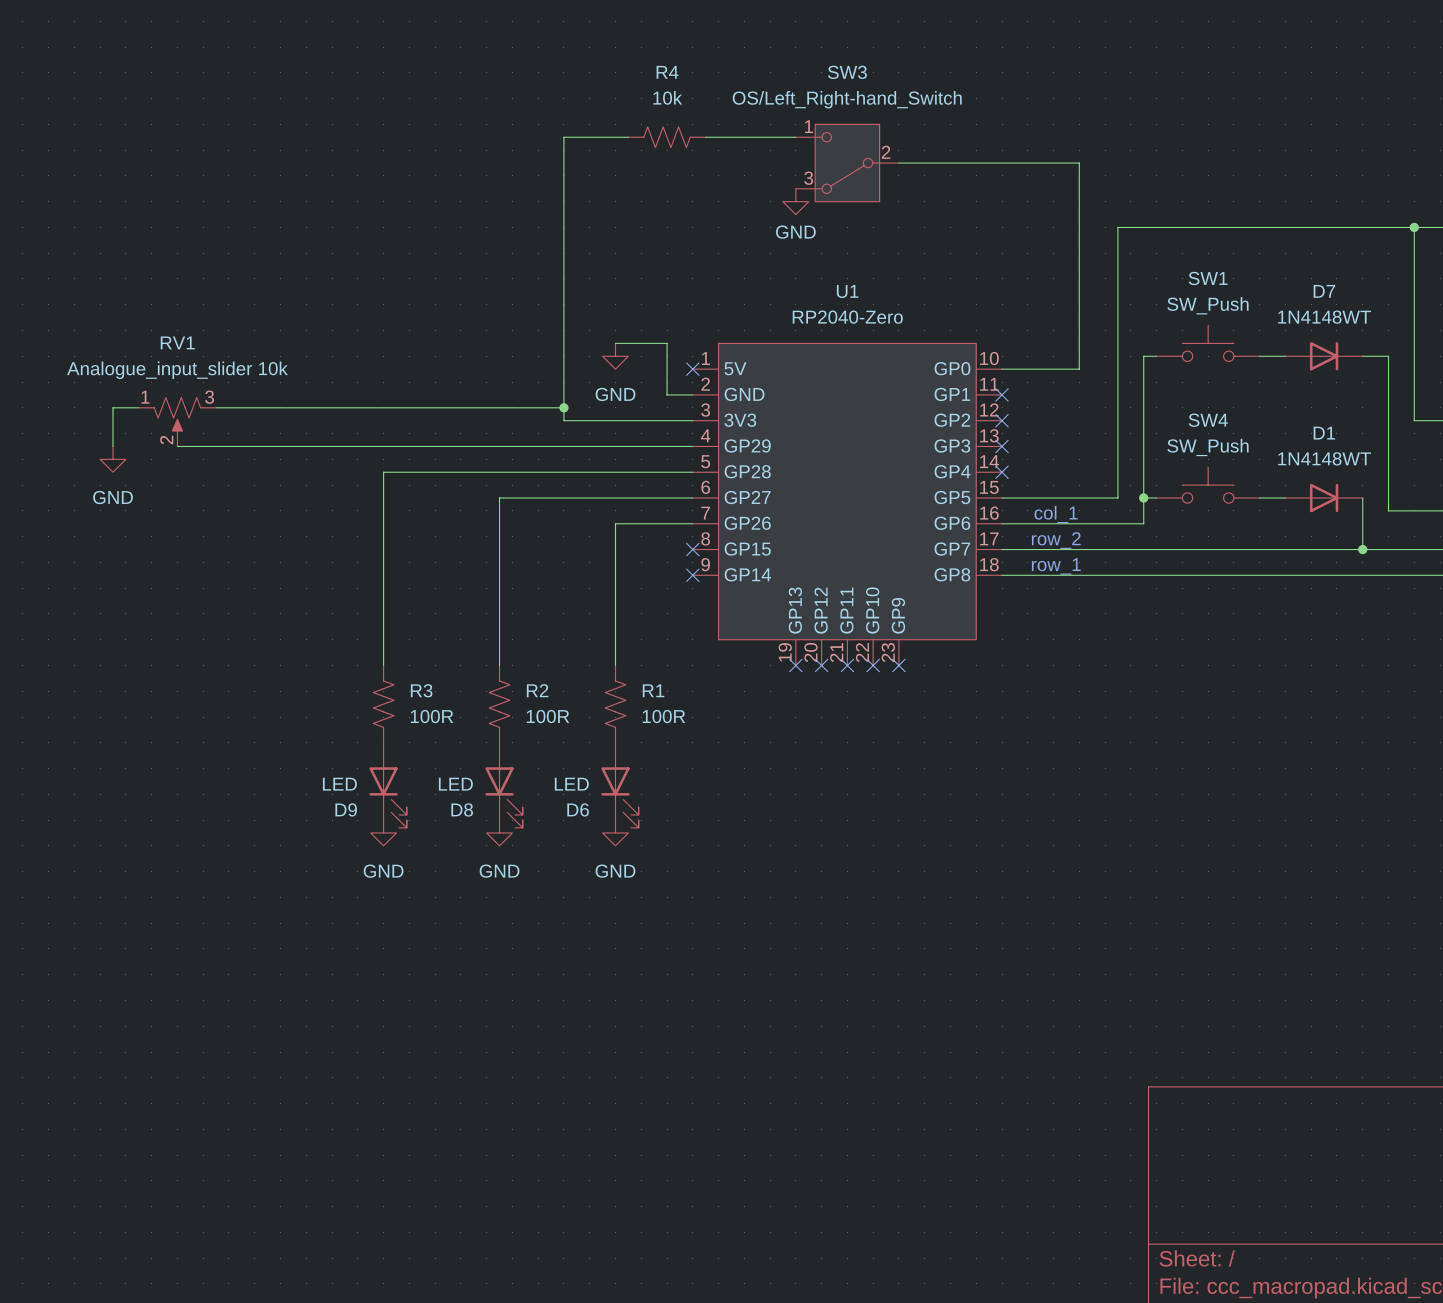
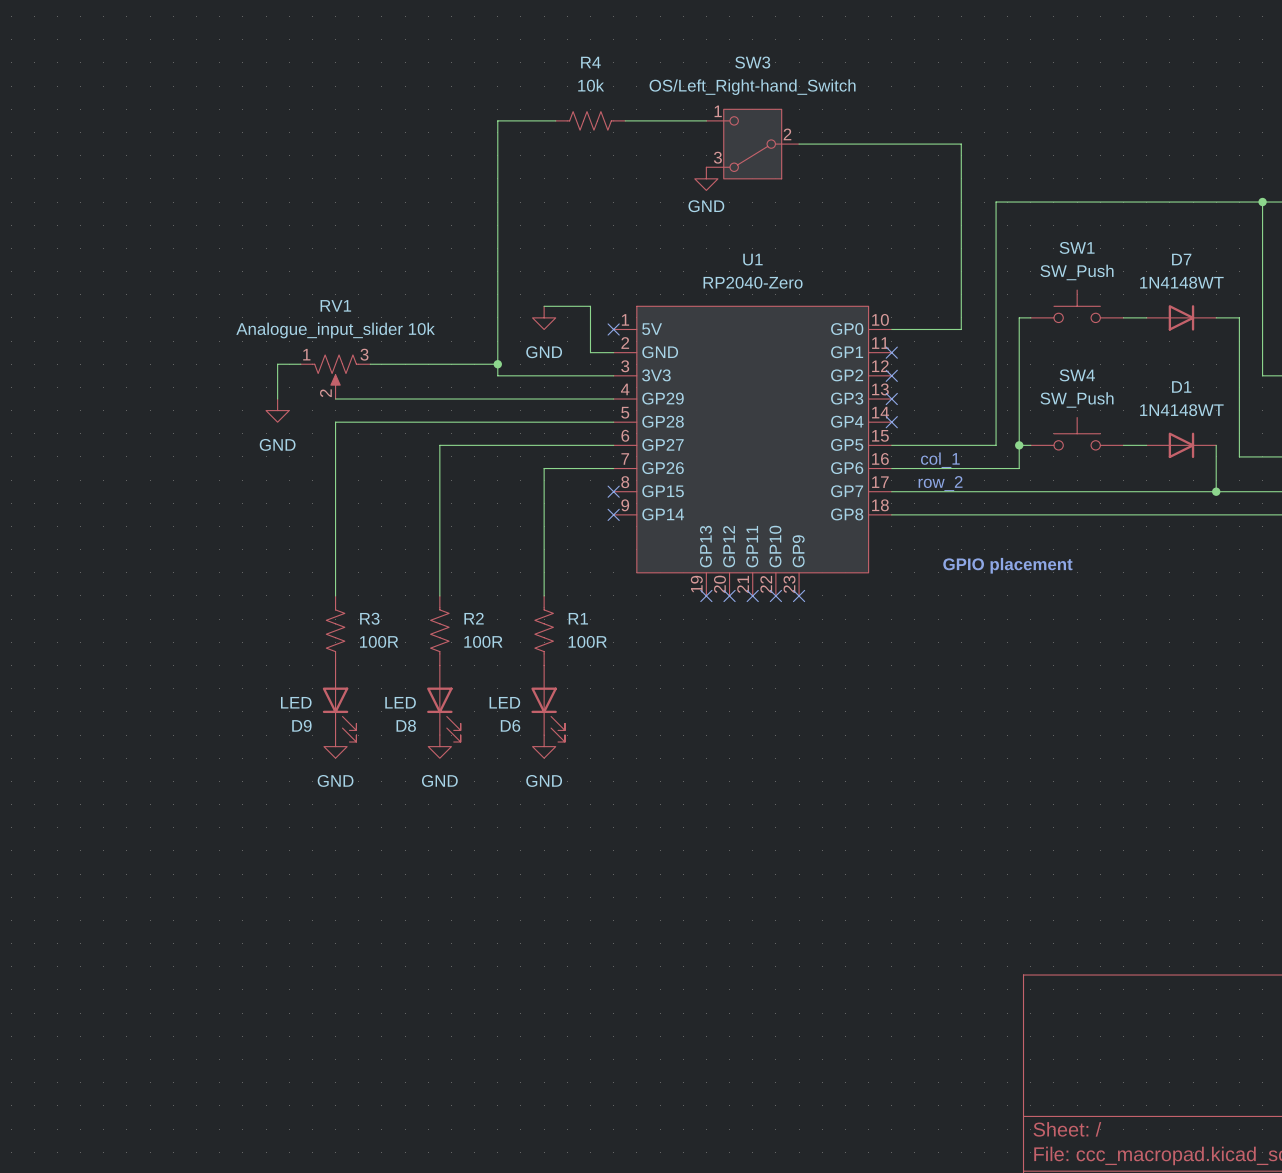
wire: (138, 407) (113, 407) (113, 446) -> none
wire: (216, 407) (319, 407) -> (277, 399) (277, 364)
wire: (344, 407) (422, 407) -> none
RV1 position: (177, 421) -> (335, 376)
wire: (177, 446) (383, 446) -> none
power symbol position: GND (113, 459) -> GND (277, 410)
text: row_1 (1056, 566) -> none
text: none -> GPIO placement (1007, 565)

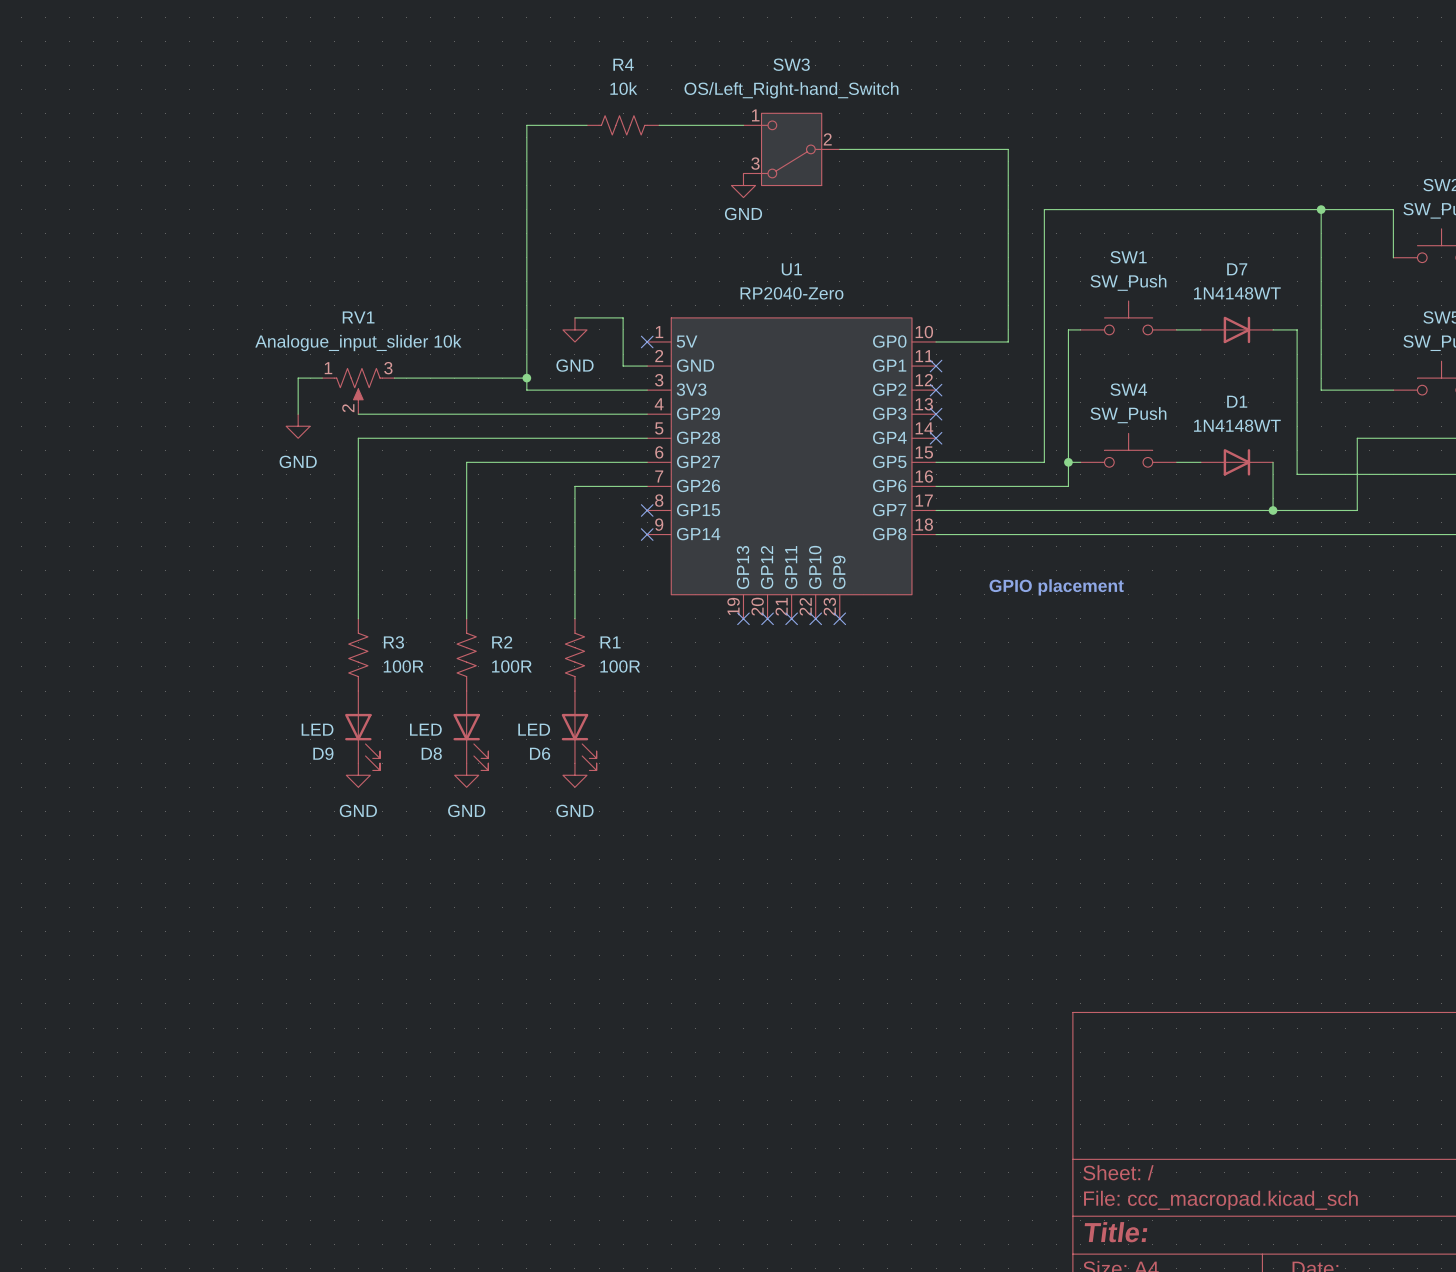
text: col_1 (940, 460) -> none
text: row_2 (940, 483) -> none

